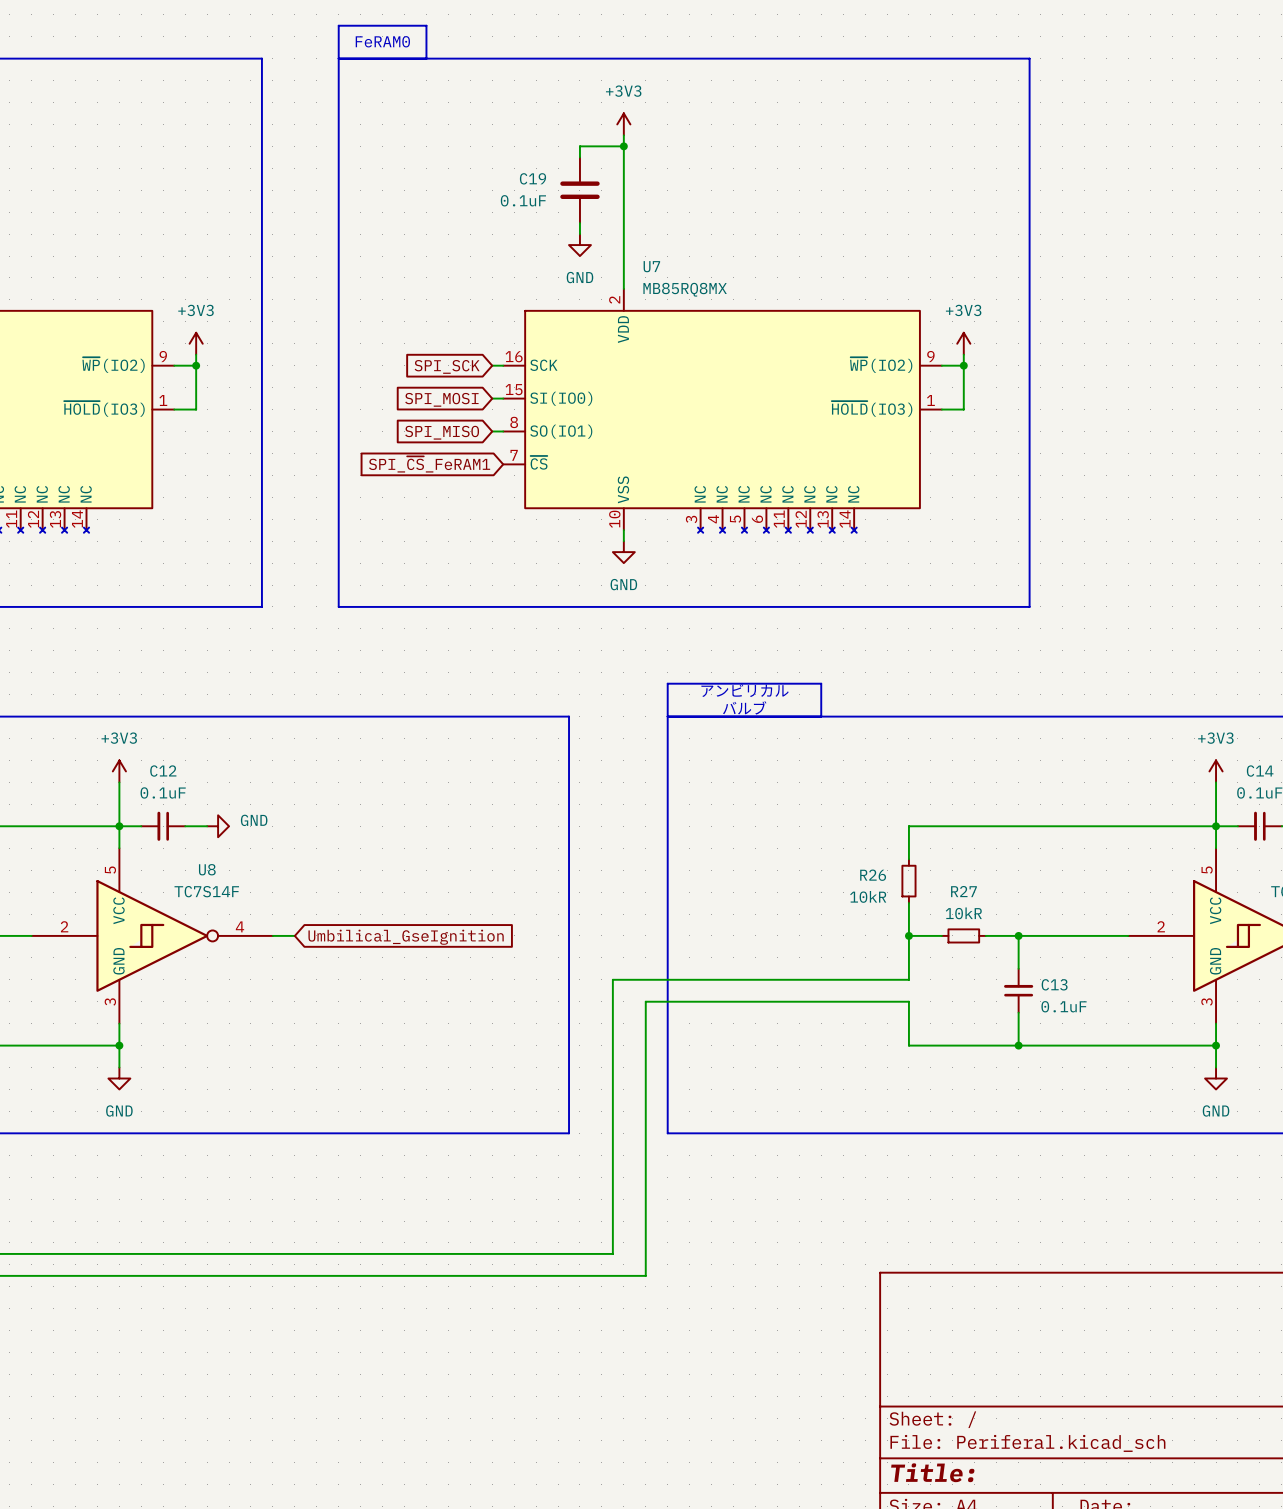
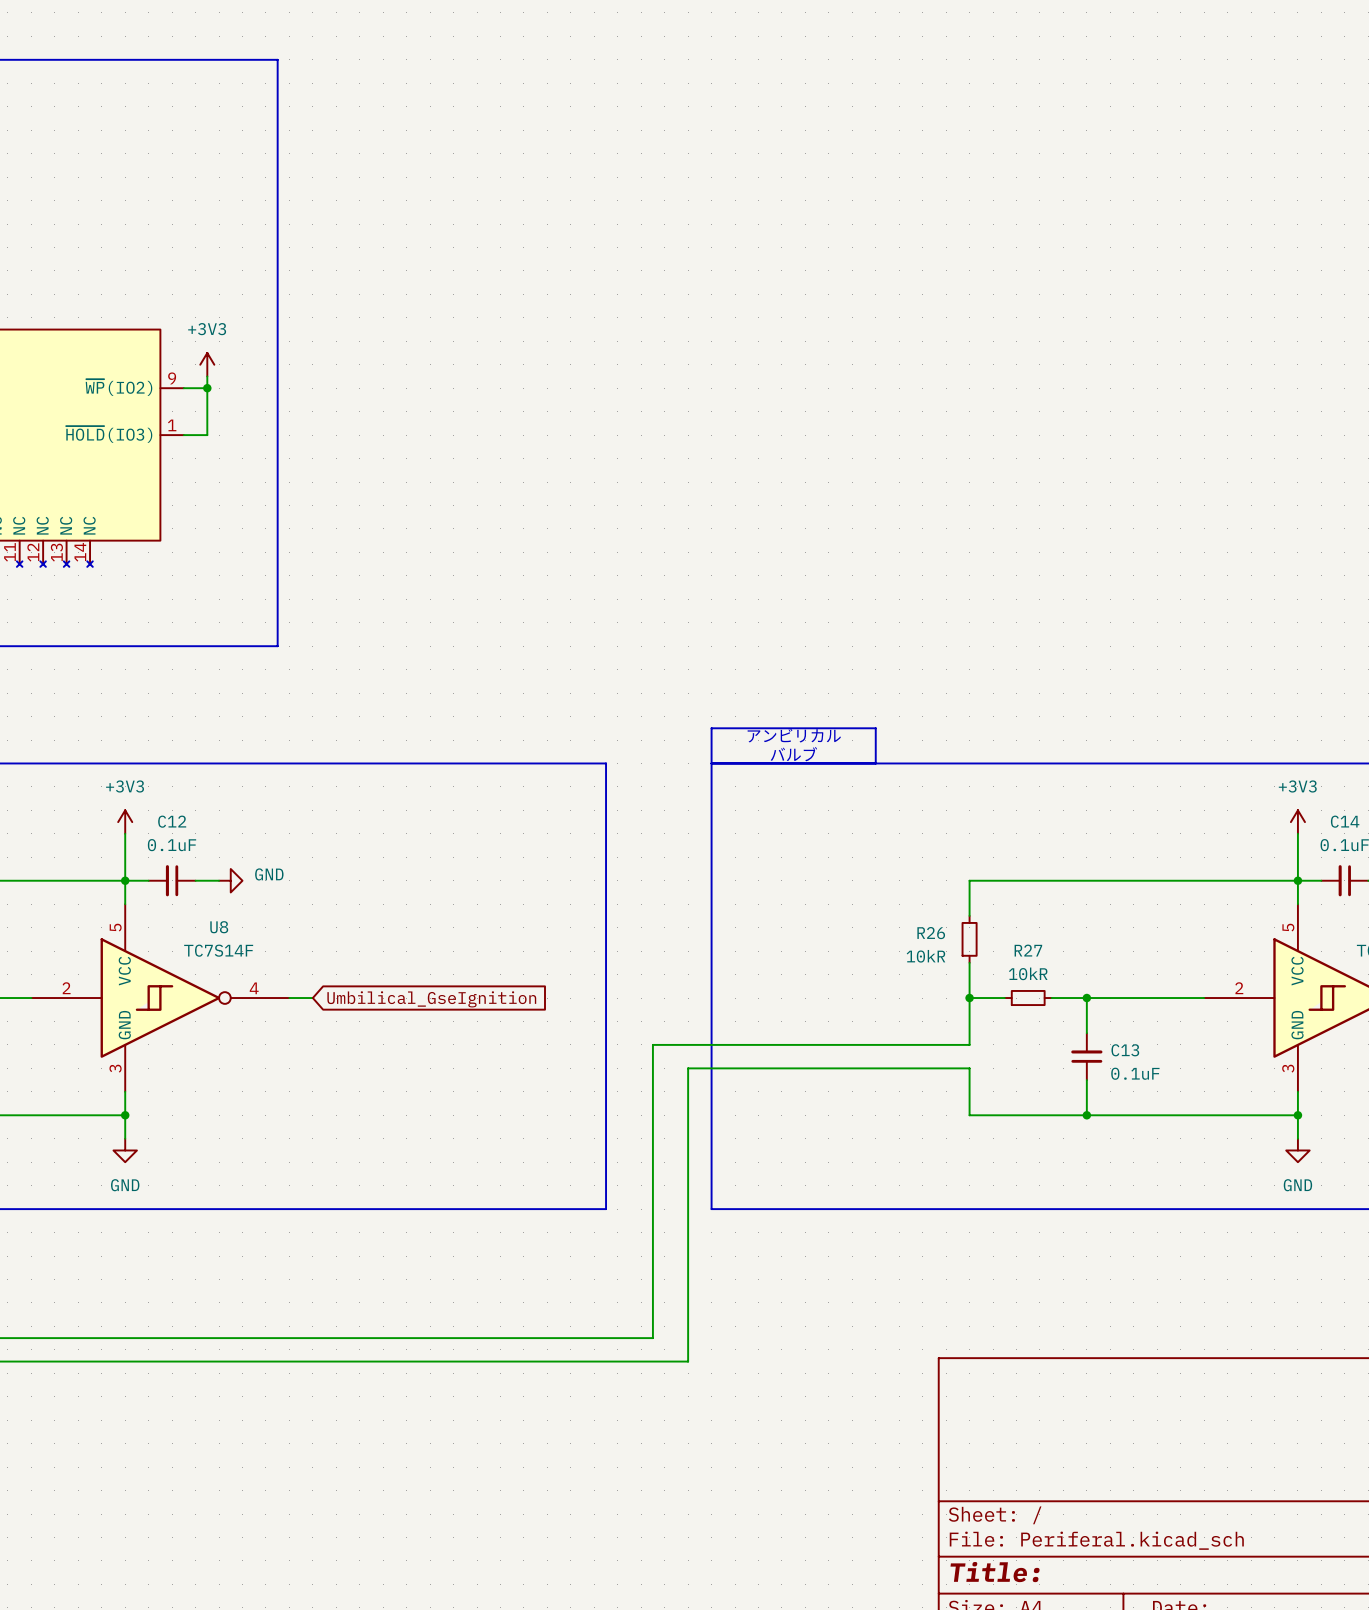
text: FeRAM0 (382, 41) -> none
line: (338, 58) (1029, 58) (1029, 606) (338, 606) (338, 25) (426, 25) (426, 58) -> none
power symbol: +3V3 (623, 124) -> none
wire: (623, 135) (623, 288) -> none
wire: (623, 146) (579, 146) (579, 157) -> none
junction: (623, 146) -> none
C19: 0.1uF (579, 190) -> none
wire: (579, 223) (579, 234) -> none
power symbol: GND (579, 245) -> none
power symbol: +3V3 (963, 343) -> none
wire: (963, 354) (963, 409) (941, 409) -> none
wire: (492, 365) (503, 365) -> none
wire: (941, 365) (963, 365) -> none
junction: (963, 365) -> none
global label: SPI_SCK (447, 366) -> none
wire: (492, 398) (503, 398) -> none
global label: SPI_MOSI (441, 399) -> none
U7: MB85RQ8MX (722, 410) -> none
wire: (492, 431) (503, 431) -> none
global label: SPI_MISO (442, 432) -> none
global label: SPI_~{CS}_FeRAM1 (429, 464) -> none
wire: (623, 530) (623, 541) -> none
power symbol: GND (623, 552) -> none

